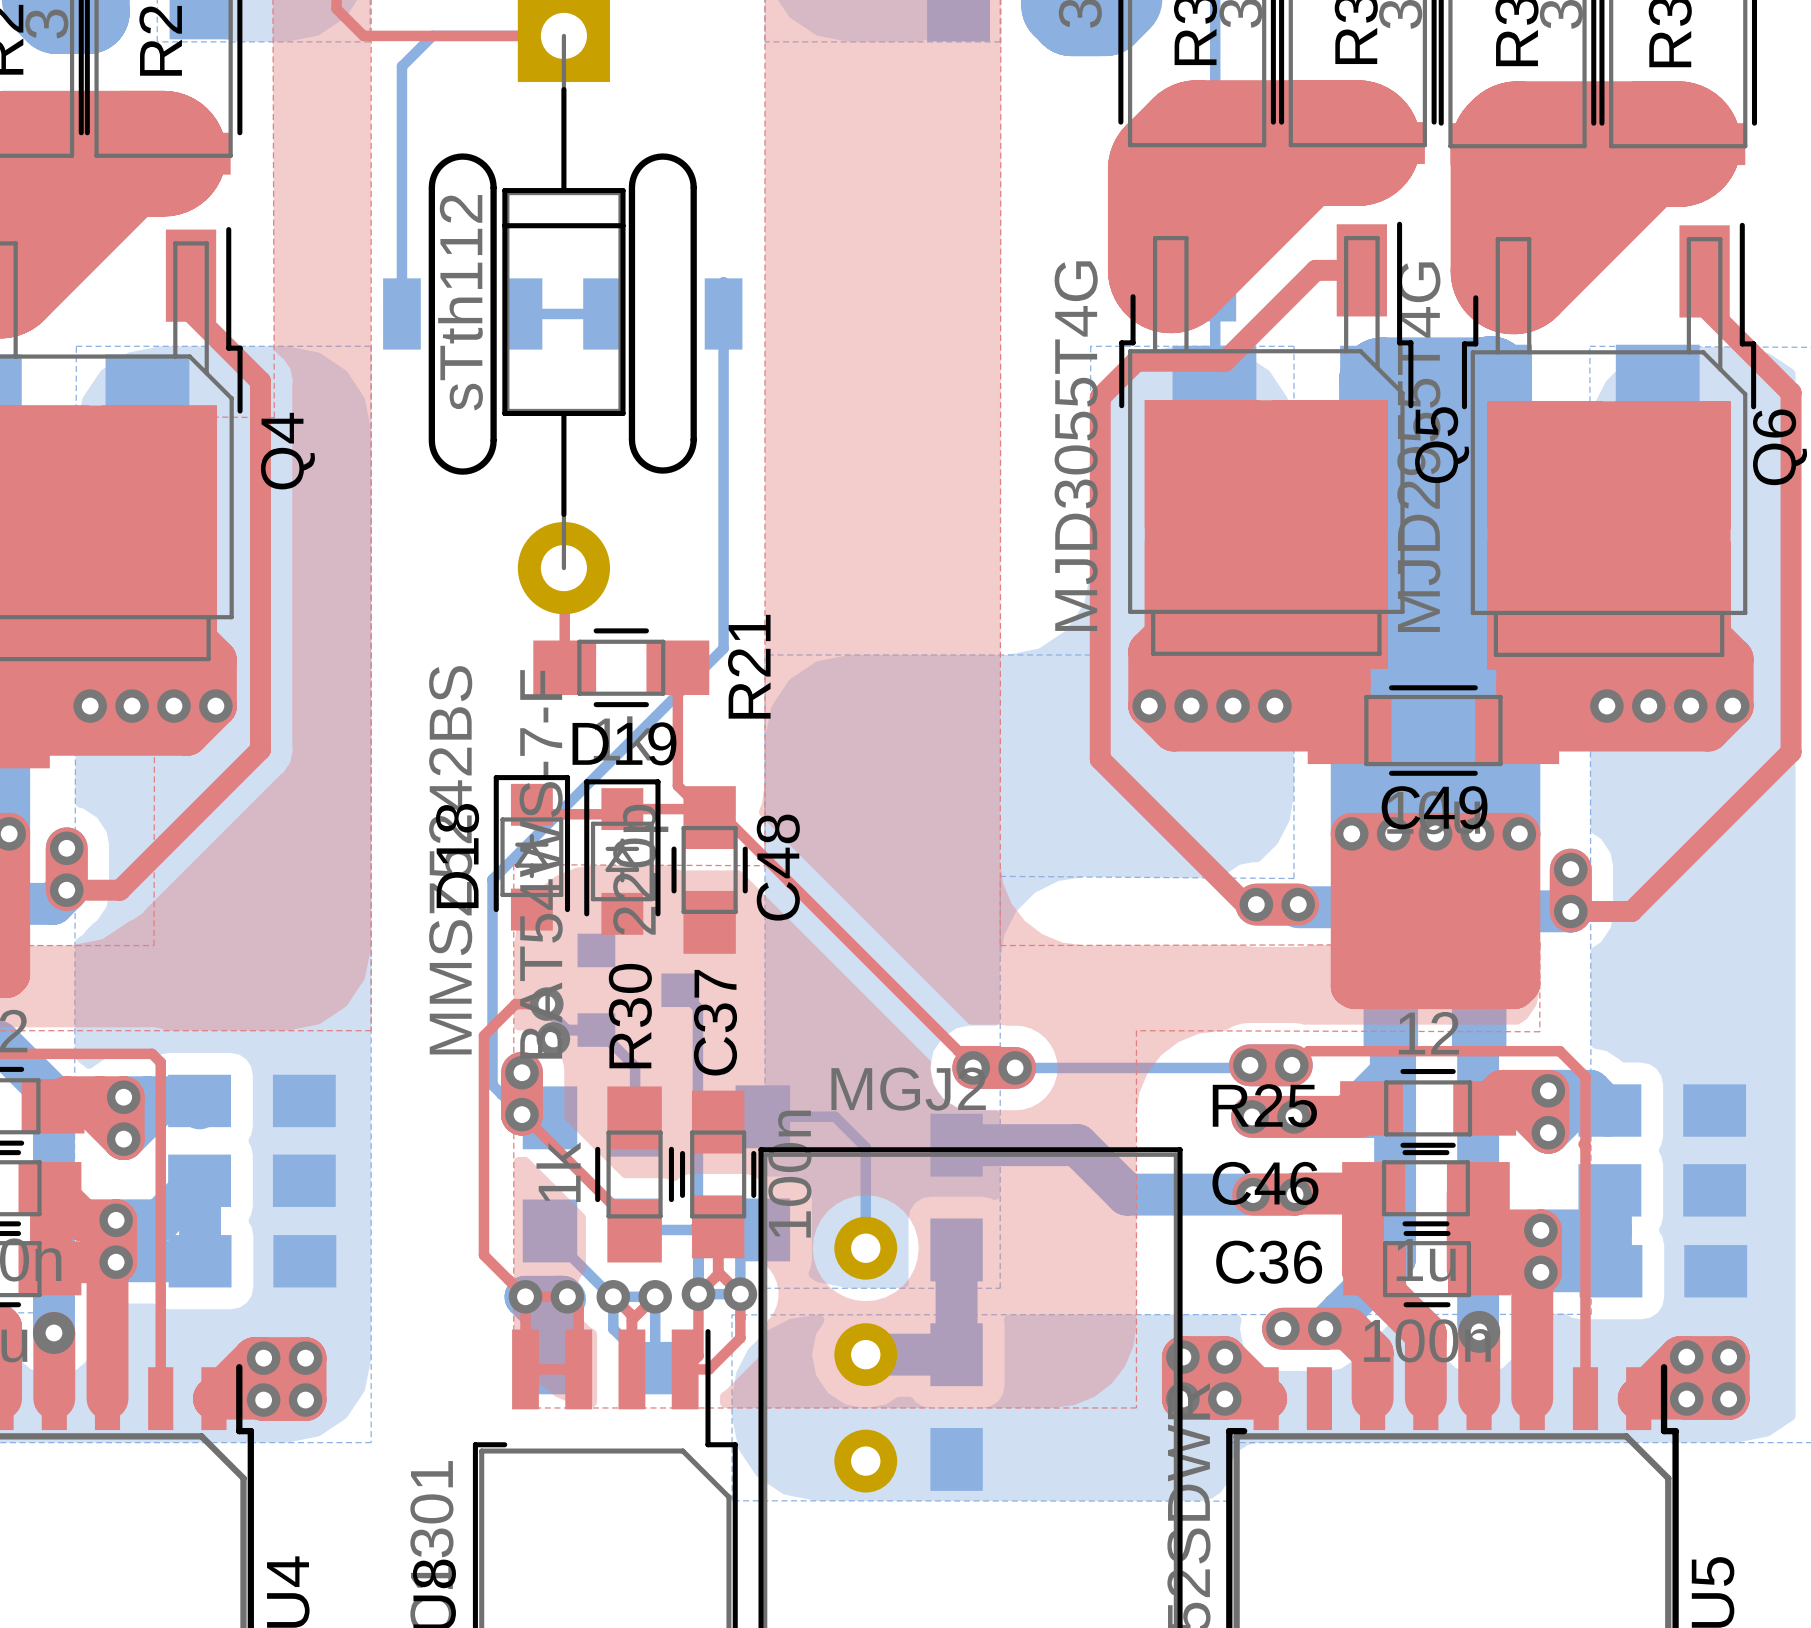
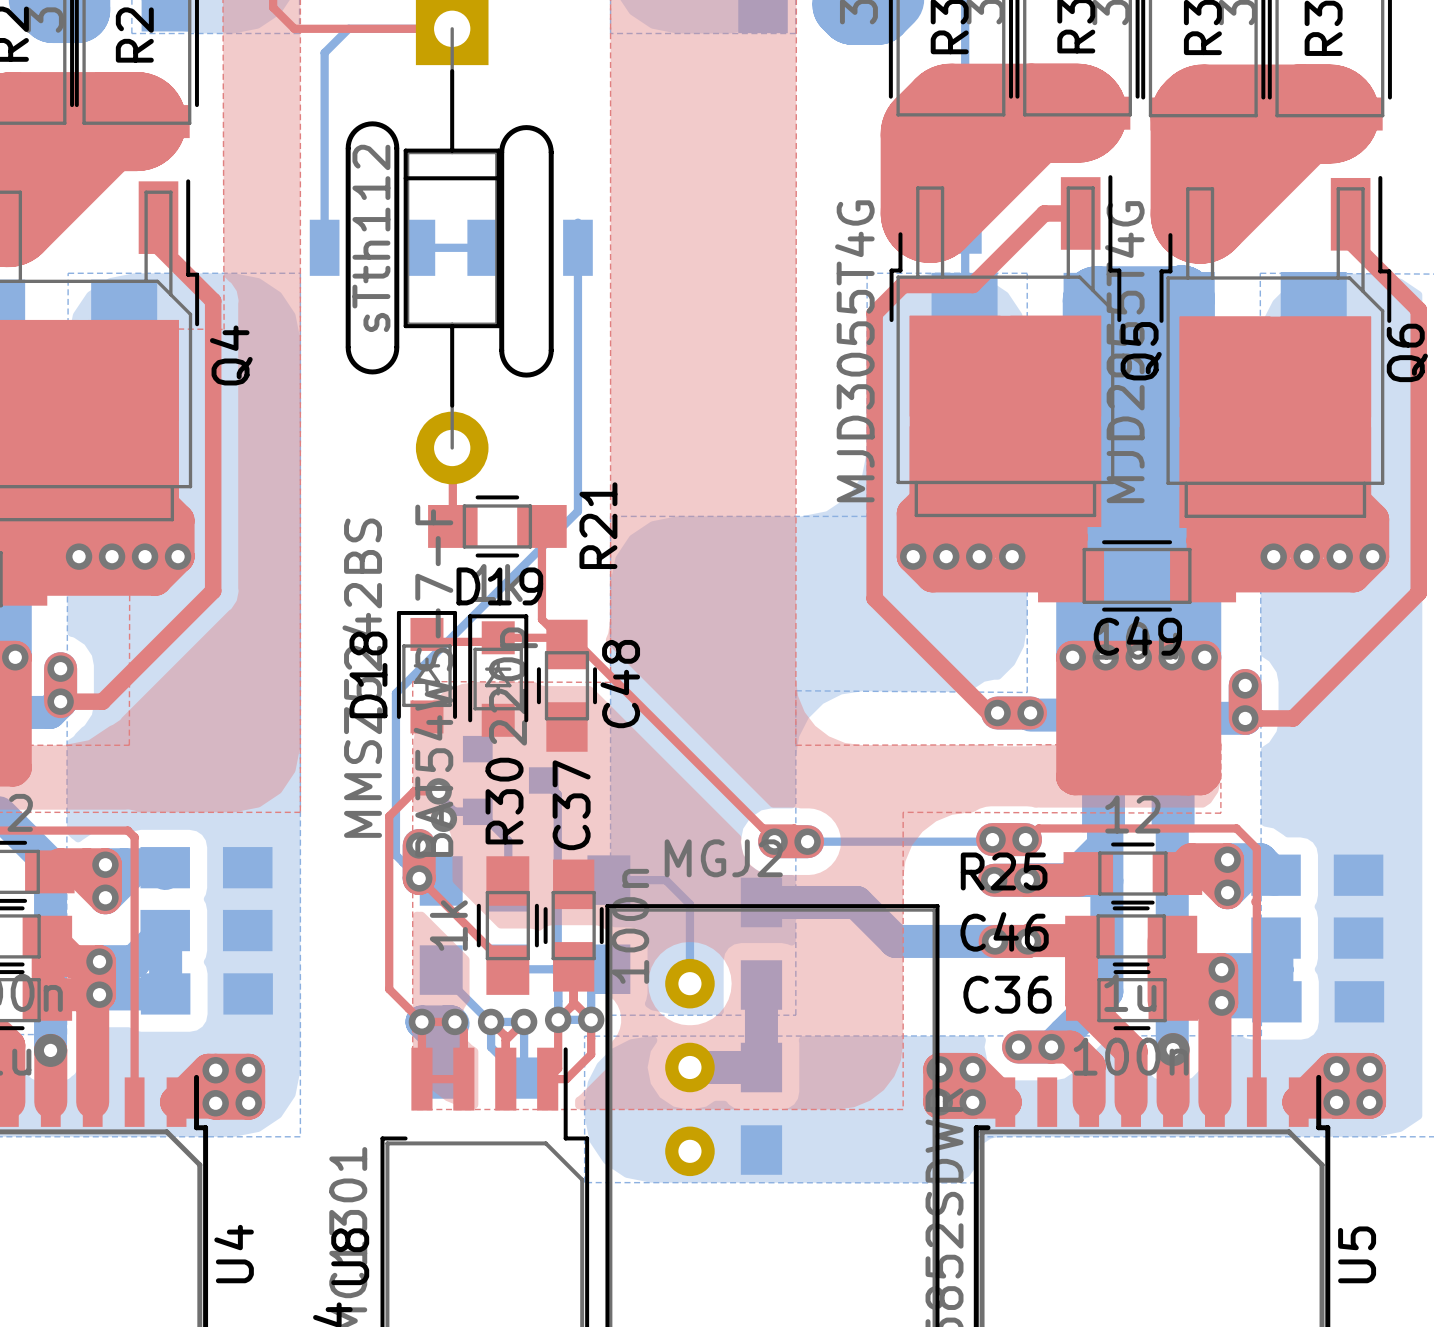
board edge: (631, 187) (634, 175) (641, 165) (651, 158) (662, 156) (674, 158) (684, 165) (691, 175) (693, 187) -> none
board edge: (631, 188) (632, 443) (634, 451) (641, 461) (651, 468) (662, 470) (674, 468) (684, 461) (691, 451) (693, 443) (693, 188) -> none
board edge: none -> (501, 152) (501, 353) (505, 362) (511, 369) (520, 374) (529, 374) (543, 367) (551, 353) (551, 149) (547, 139) (541, 132) (532, 128) (523, 127) (508, 134) (503, 142) (501, 152)

